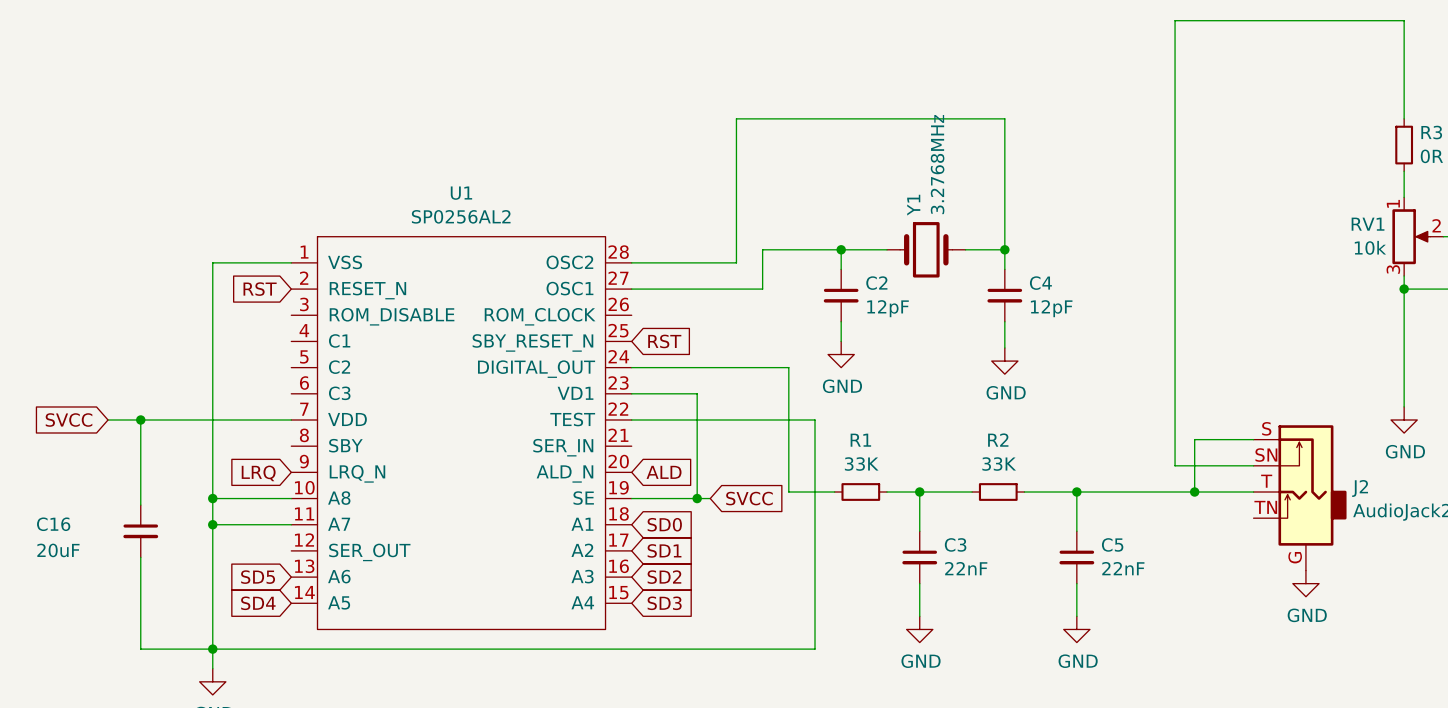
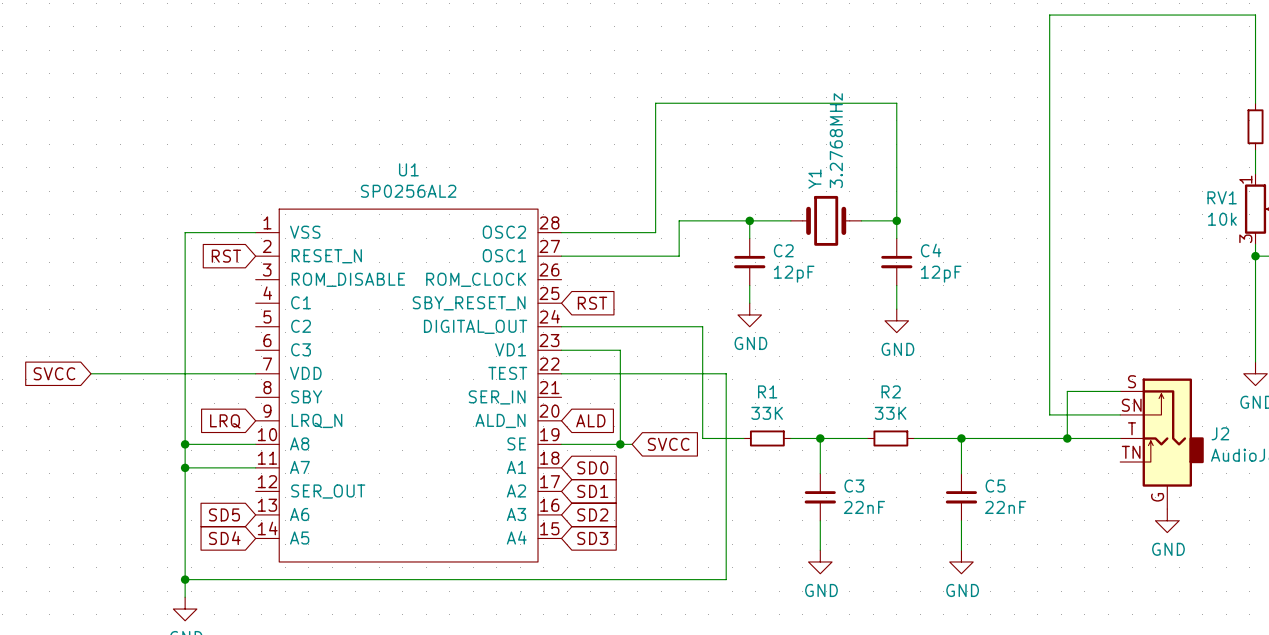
wire: (140, 419) (140, 505) -> none
junction: (140, 419) -> none
C16: 20uF (140, 531) -> none
wire: (140, 557) (140, 649) (212, 649) -> none

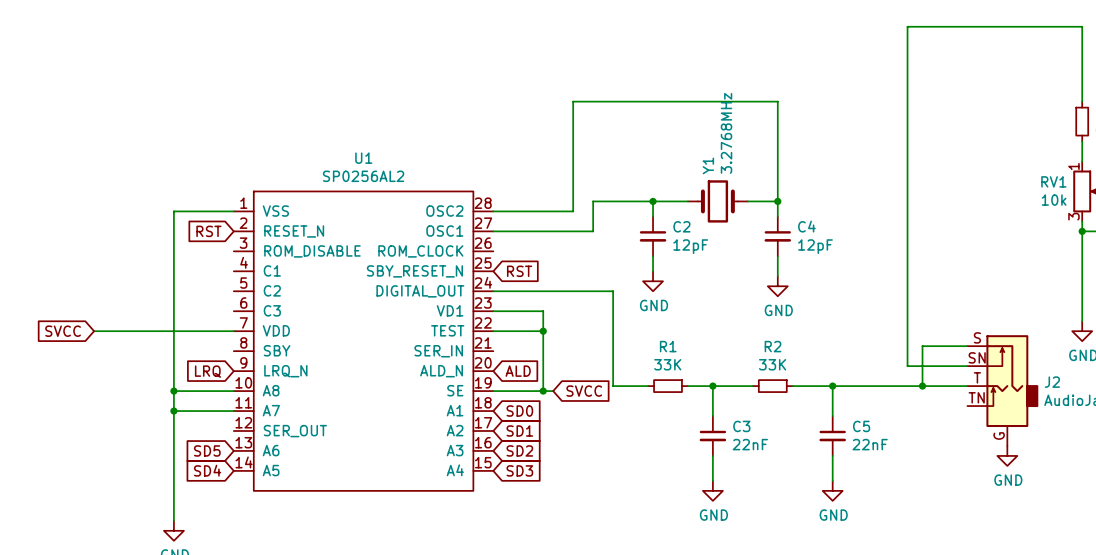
wire: (620, 373) (726, 373) (726, 579) (185, 579) -> none
junction: none -> (543, 331)
junction: (185, 579) -> none

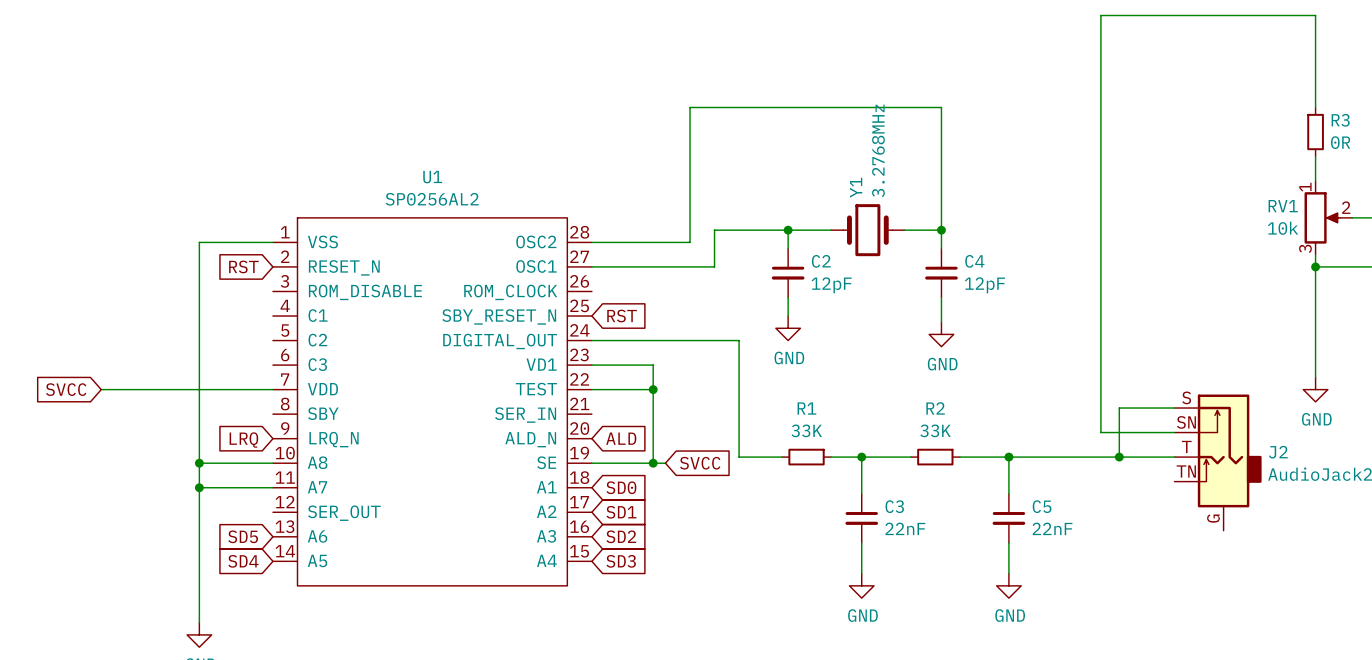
power symbol: GND (1007, 455) -> none

